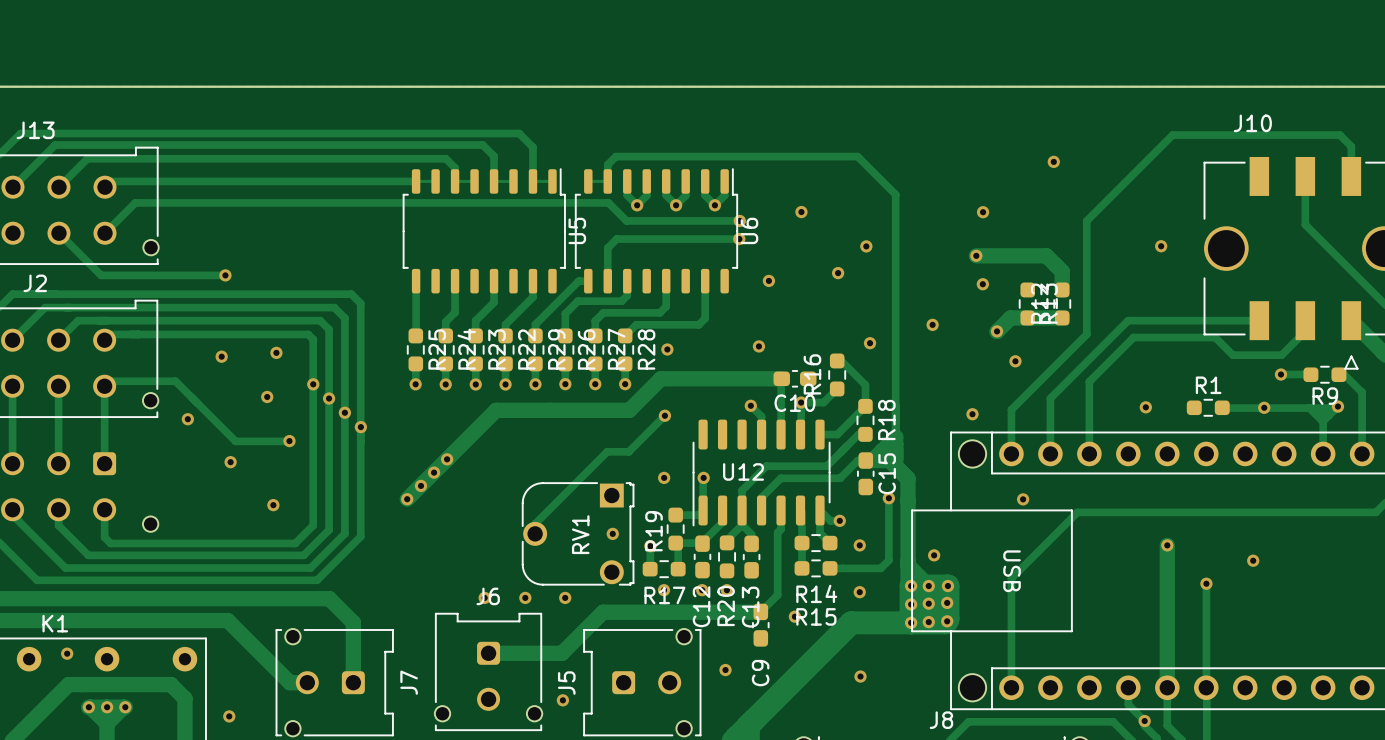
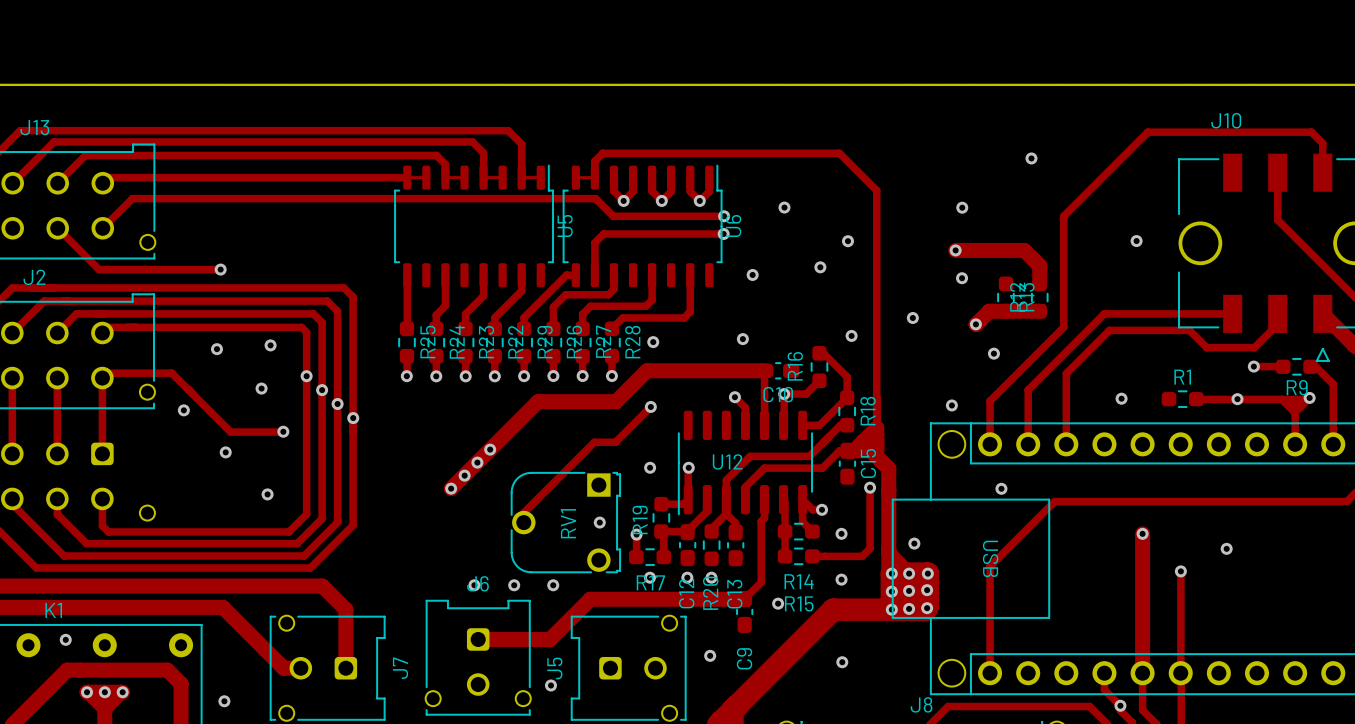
track: (549, 410) (496, 410) (407, 499) -> (538, 401) (451, 488)
via: (447, 459) -> none
via: none -> (490, 449)
via: (434, 472) -> none
via: none -> (477, 462)
via: (421, 485) -> none
via: none -> (464, 475)
via: (407, 499) -> none
via: none -> (451, 488)

